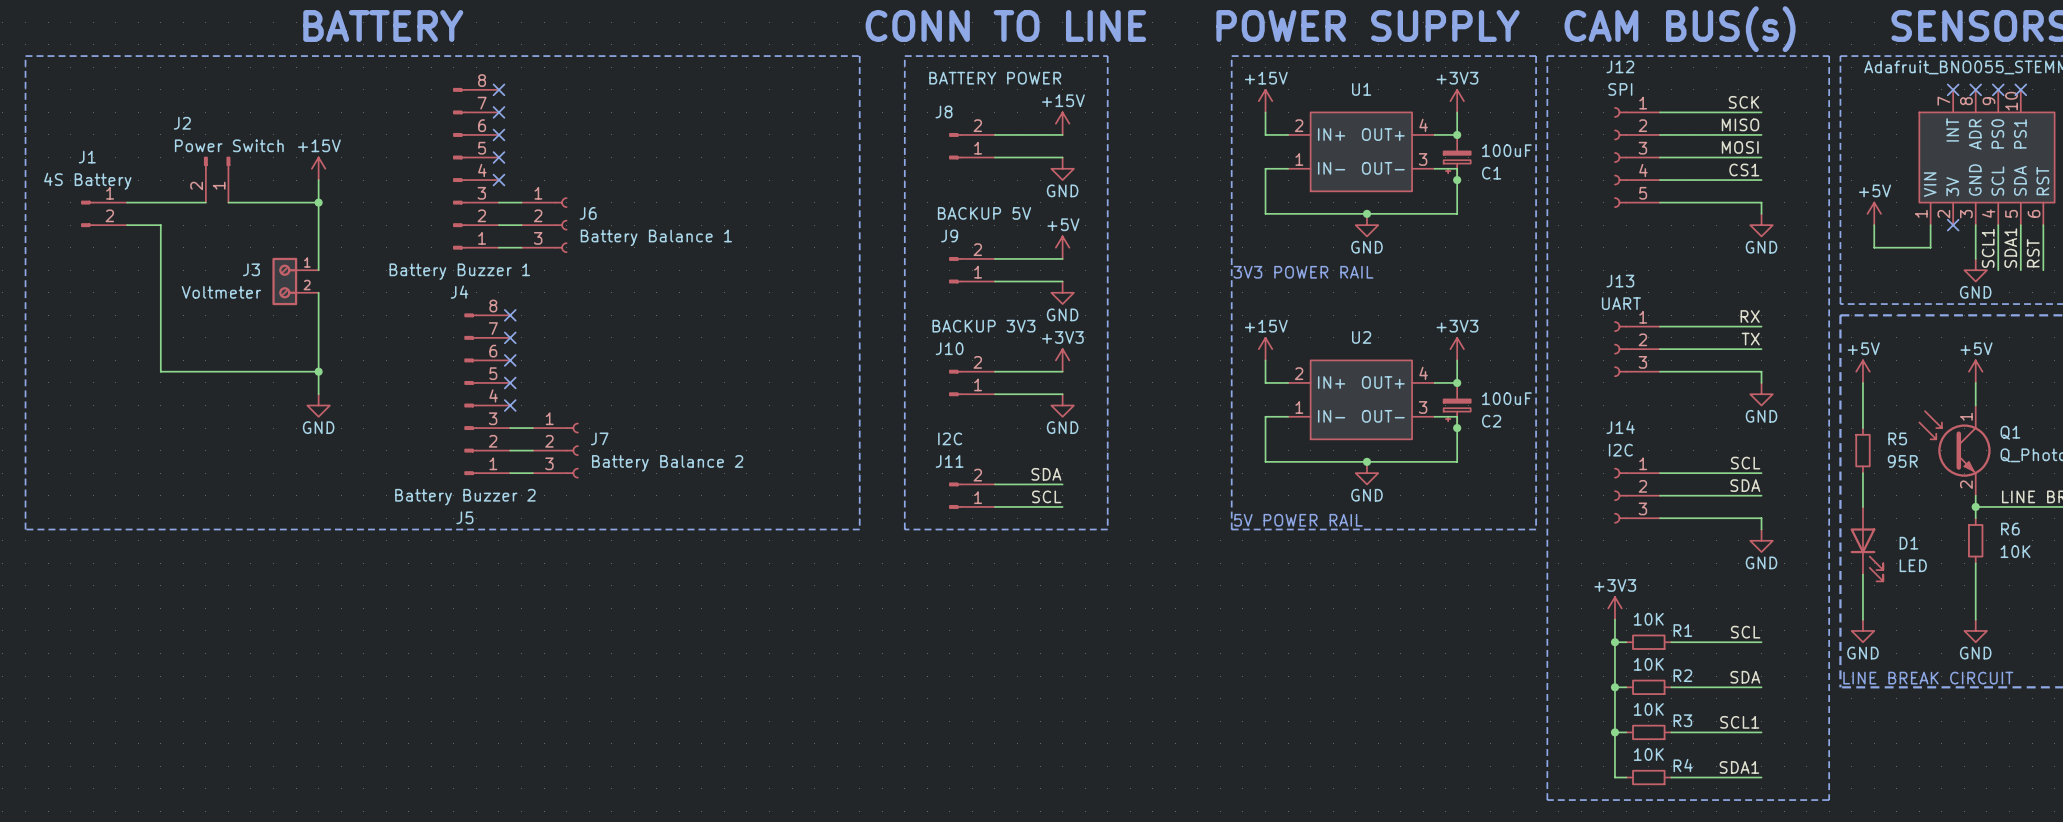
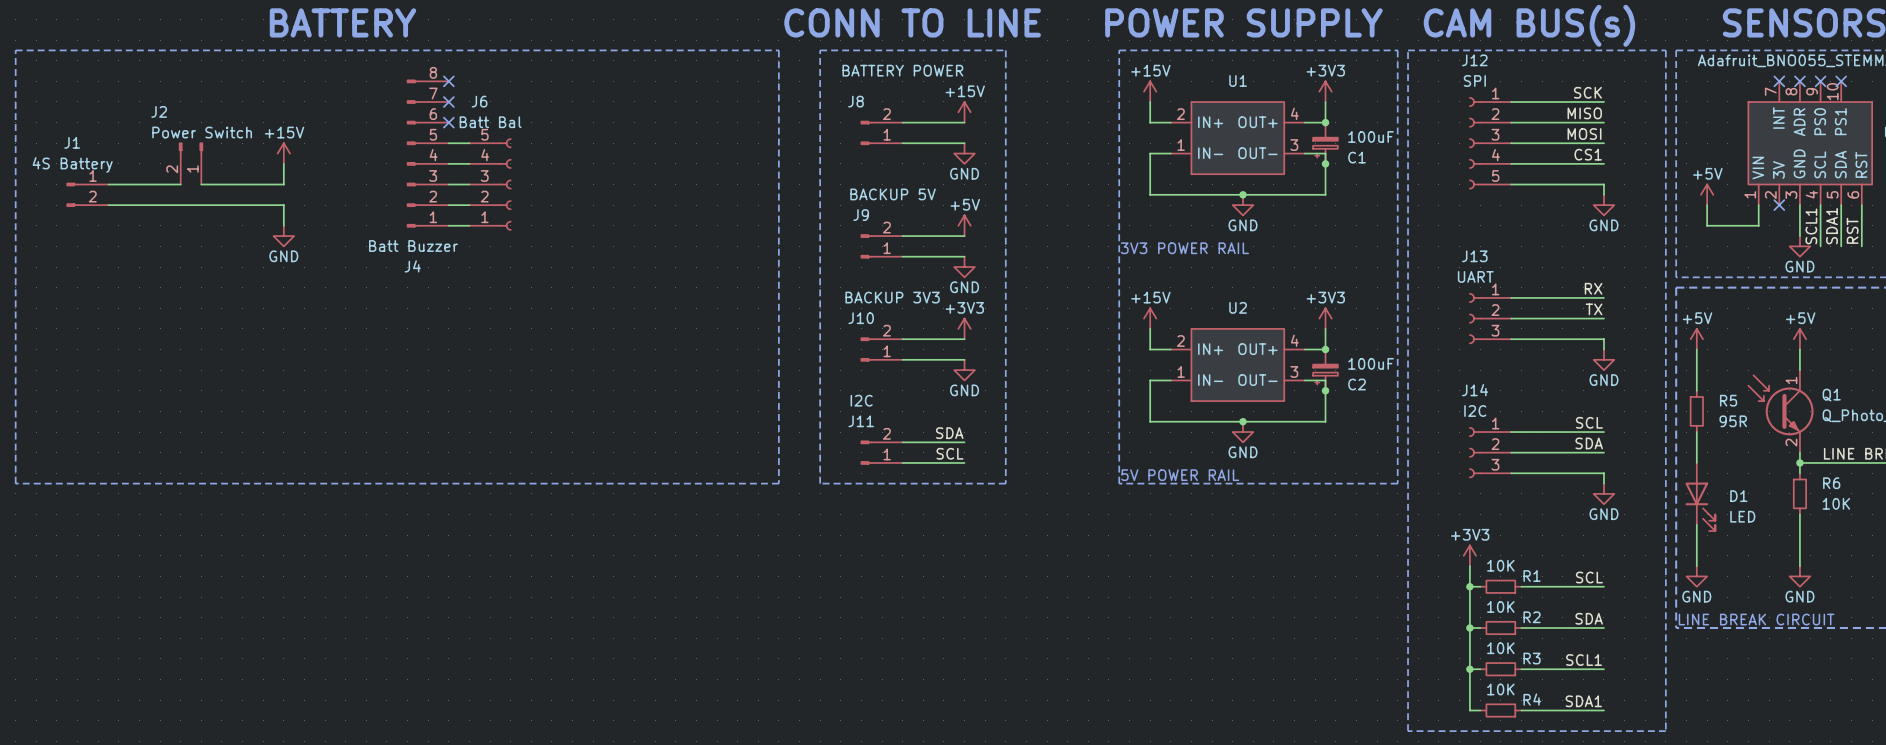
wire: none -> (448, 143) (469, 143)
no-connect mark: (498, 157) -> none
wire: none -> (448, 163) (469, 163)
no-connect mark: (498, 180) -> none
J6 symbol: [521, 197, 568, 253] -> [469, 138, 512, 231]
wire: (318, 202) (318, 225) -> none
junction: (318, 202) -> none
J6 name position: J6 (588, 213) -> J6 (479, 101)
wire: (160, 225) (160, 371) (318, 371) -> (139, 205) (283, 205)
J6 value: Battery Balance 1 (656, 237) -> Batt Bal (490, 122)
J4 value: Battery Buzzer 1 (459, 271) -> Batt Buzzer (413, 246)
J3: Voltmeter (295, 281) -> none
wire: (318, 292) (318, 394) -> none
no-connect mark: (510, 315) -> none
no-connect mark: (510, 337) -> none
no-connect mark: (510, 360) -> none
junction: (318, 371) -> none
no-connect mark: (510, 382) -> none
J5: Battery Buzzer 2 (487, 394) -> none
power symbol position: GND (318, 405) -> GND (283, 236)
no-connect mark: (510, 405) -> none
wire: (510, 428) (532, 428) -> none
wire: (510, 450) (532, 450) -> none
J7: Battery Balance 2 (555, 450) -> none
wire: (510, 473) (532, 473) -> none

